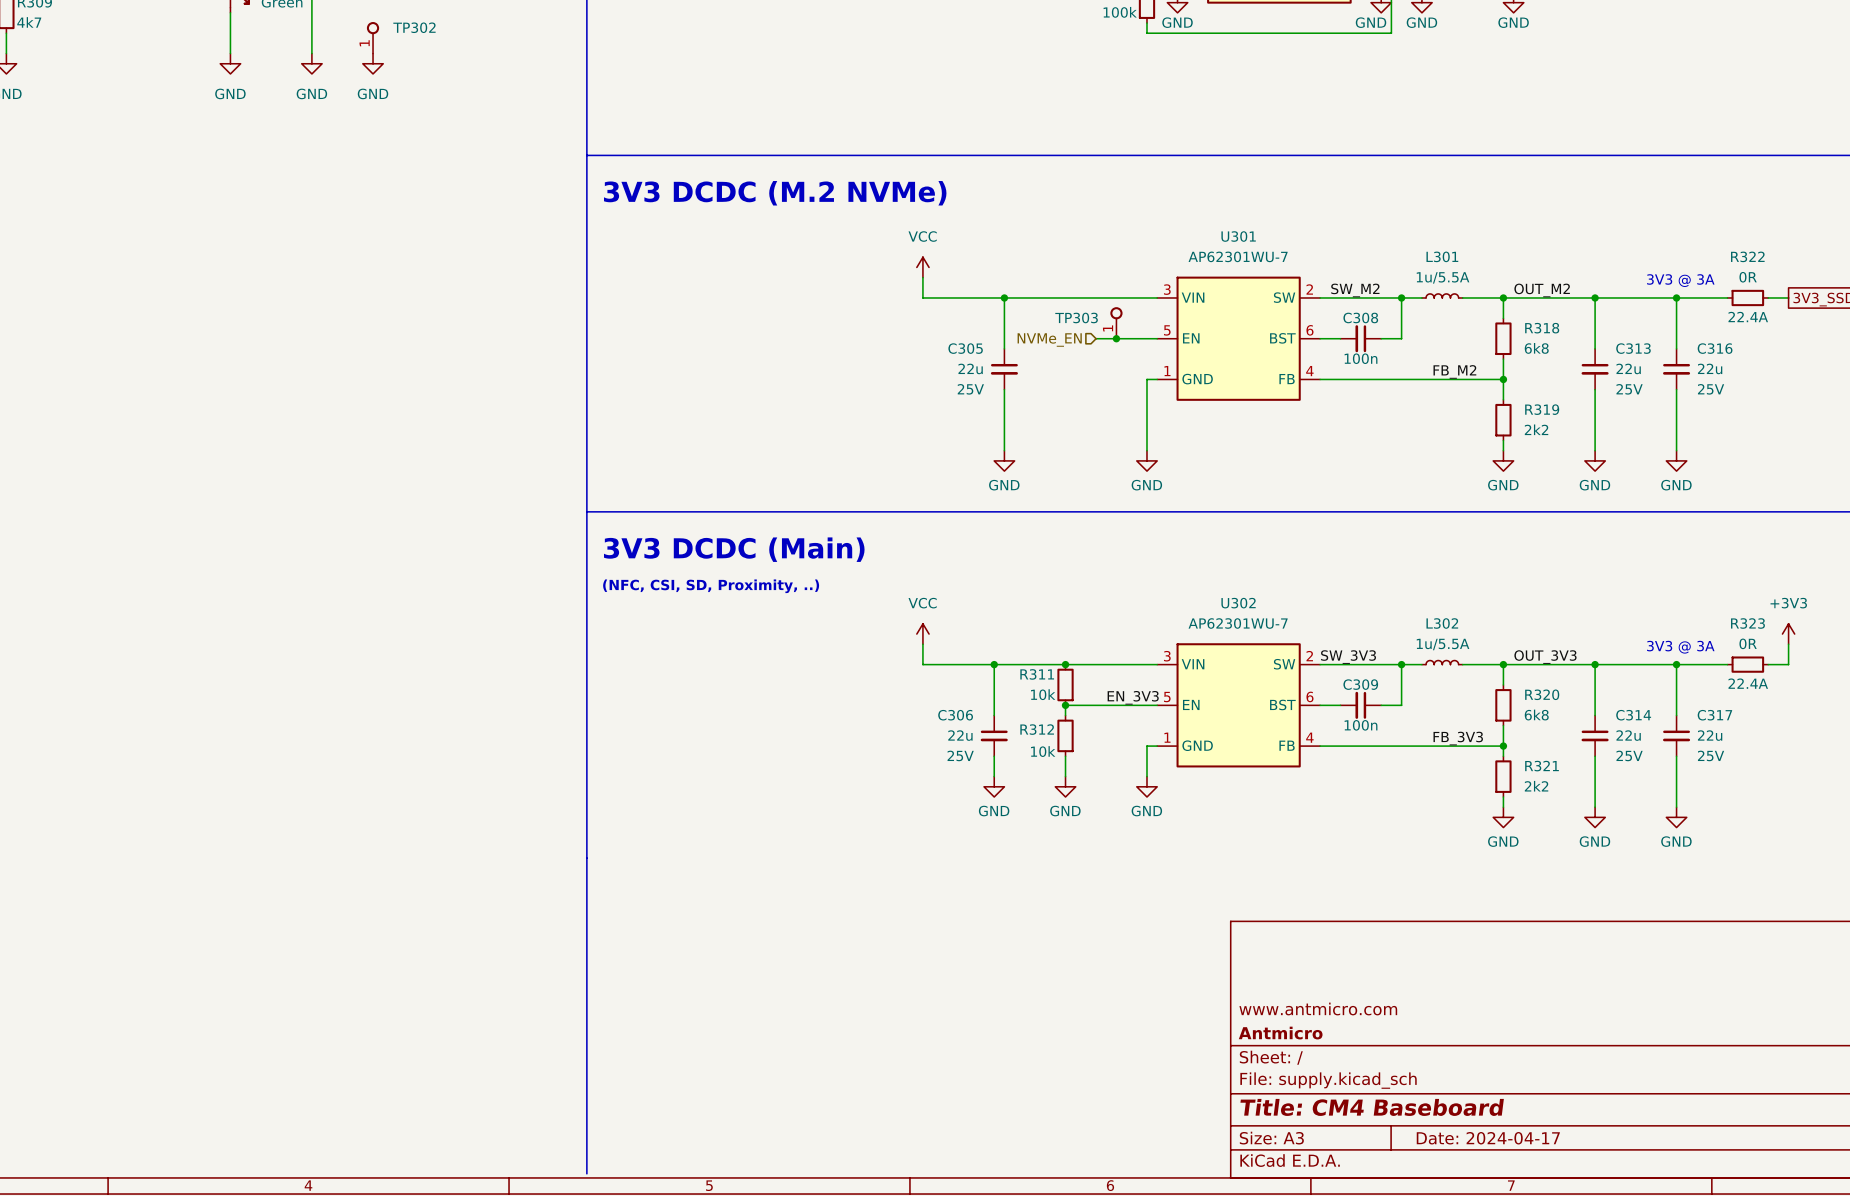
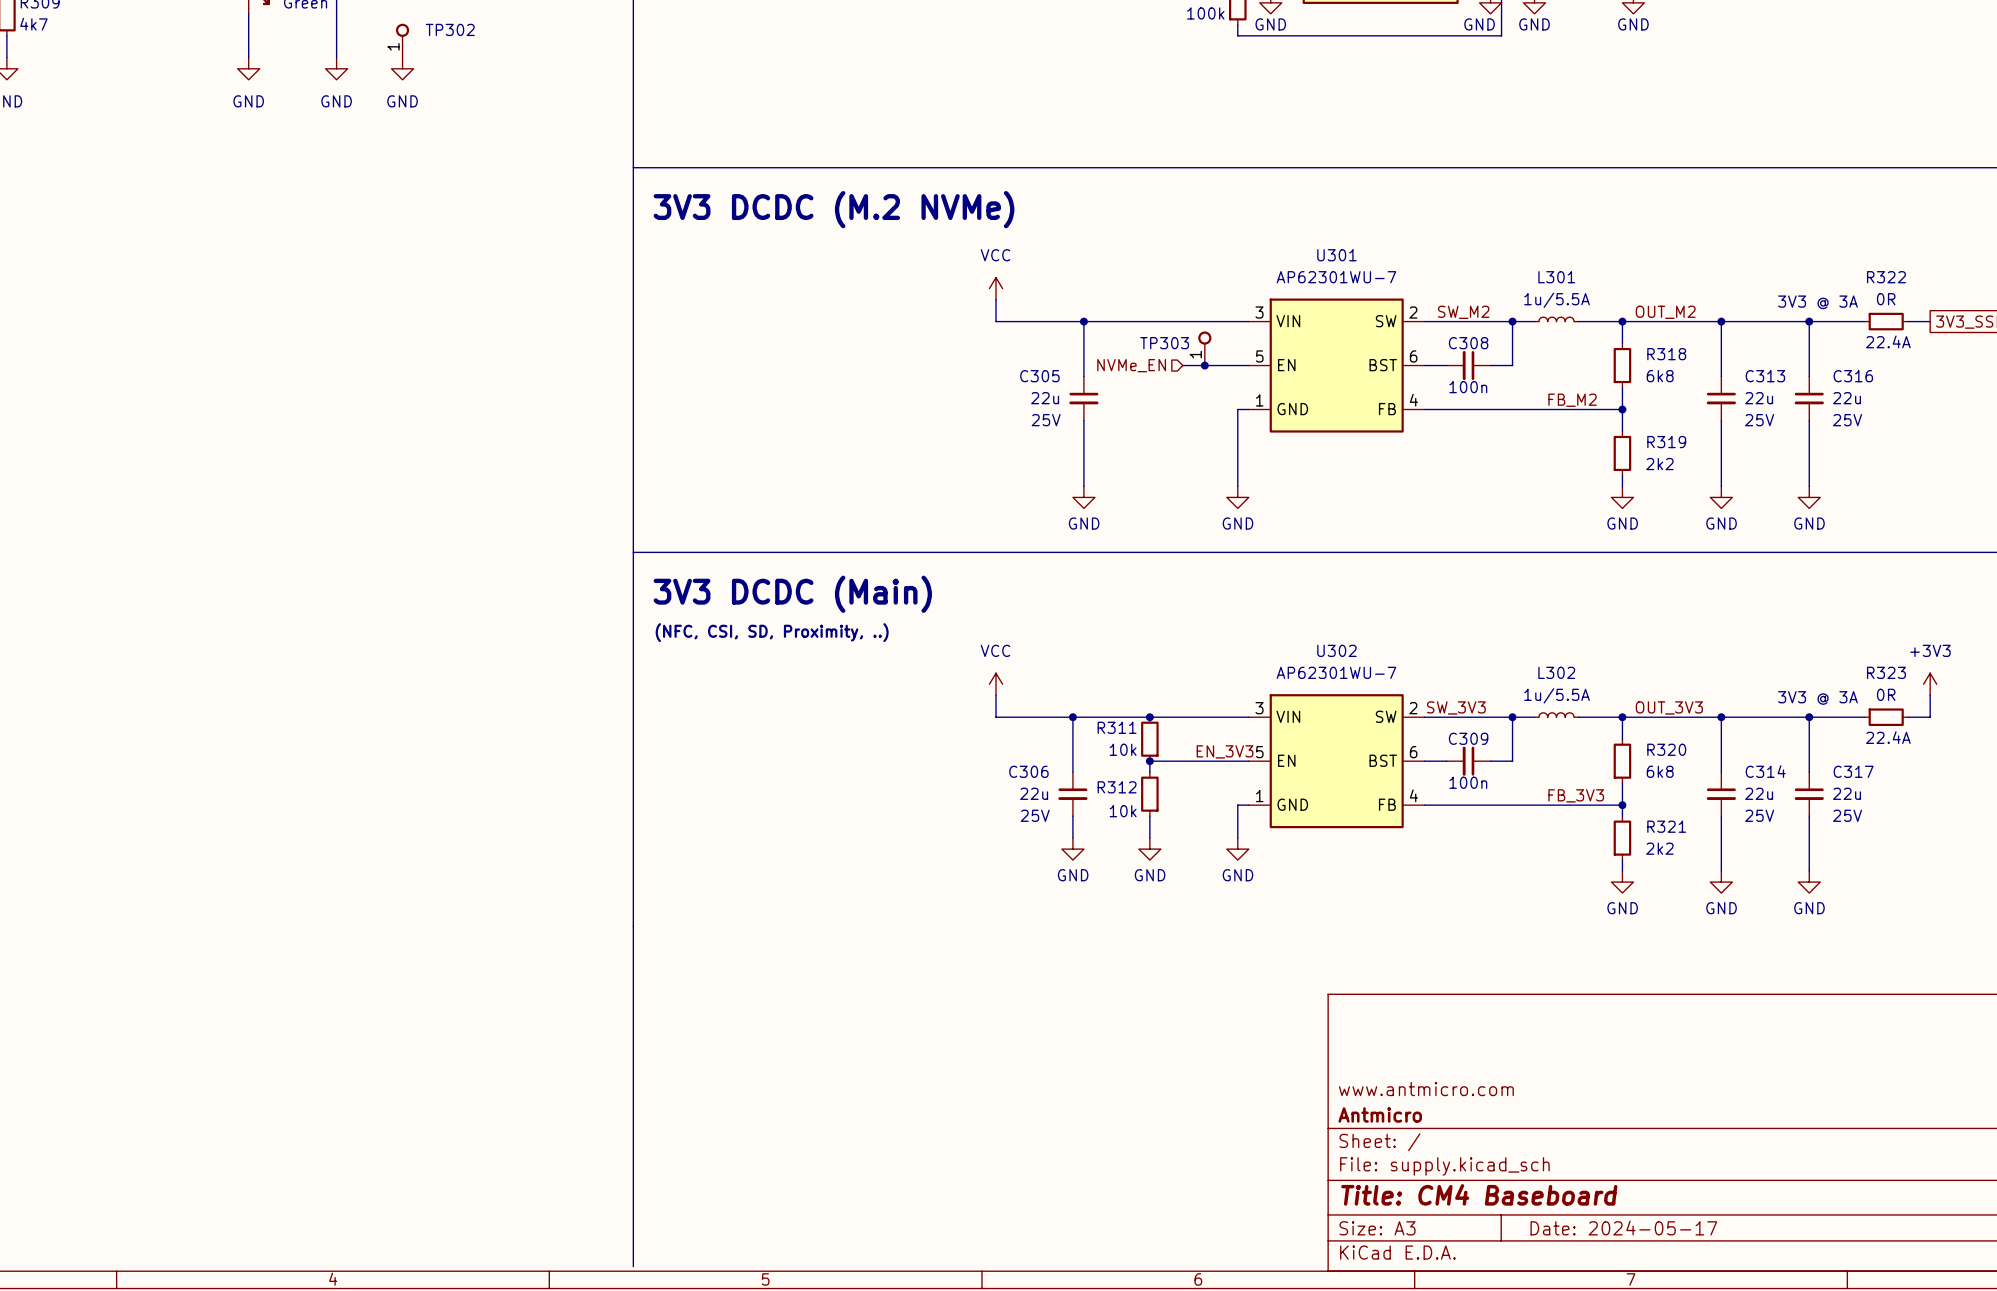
title block: Date: 2024-04-17 (1488, 1138) -> Date: 2024-05-17 (1623, 1228)

